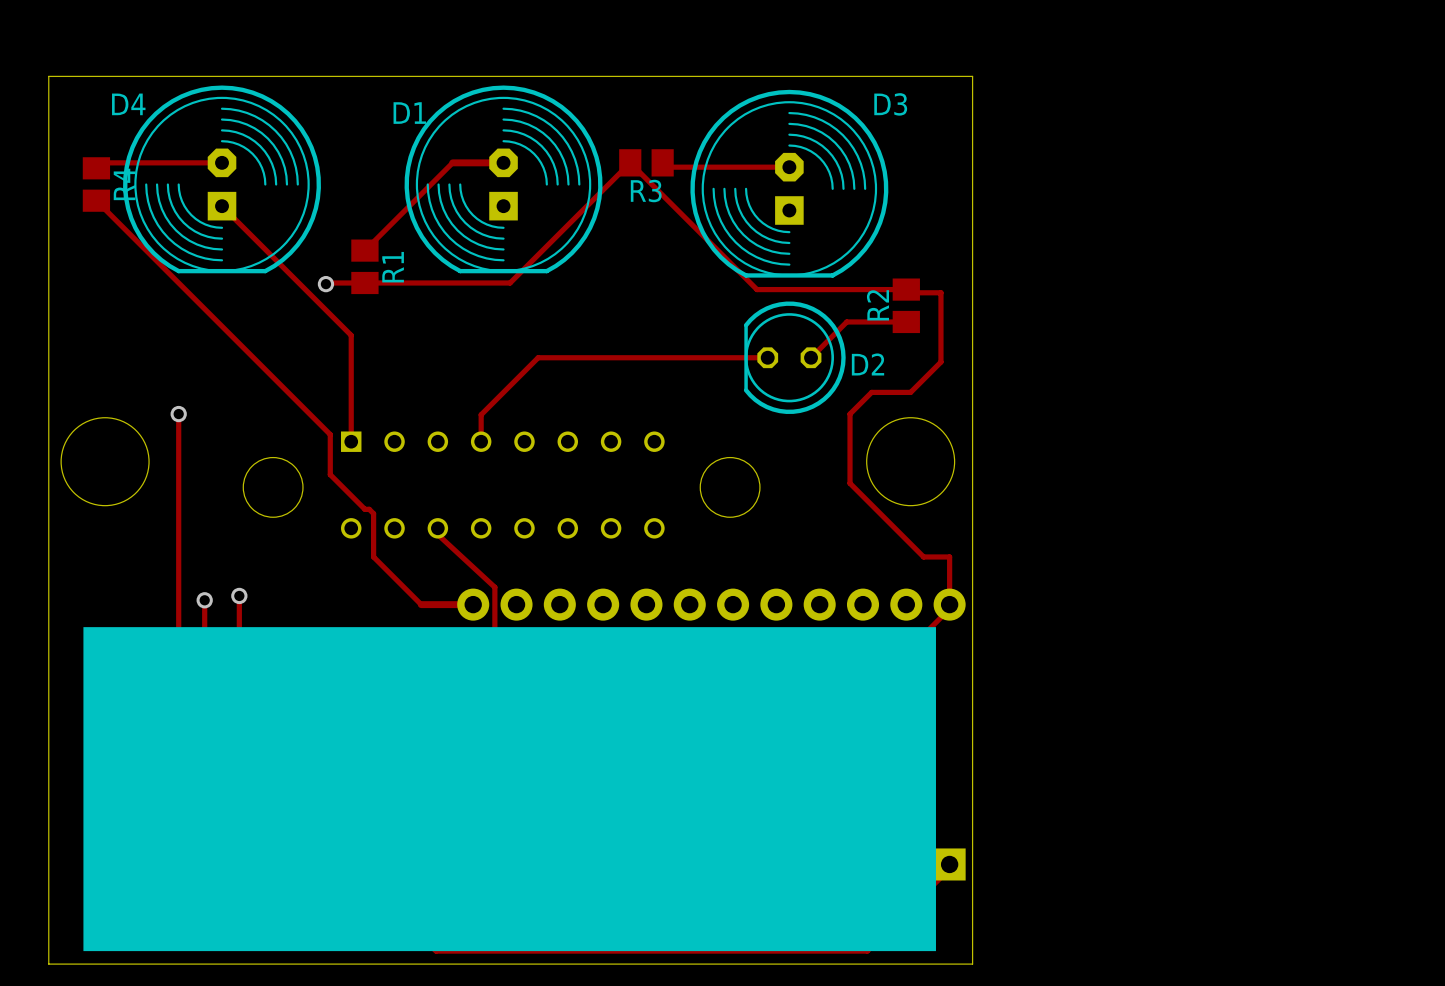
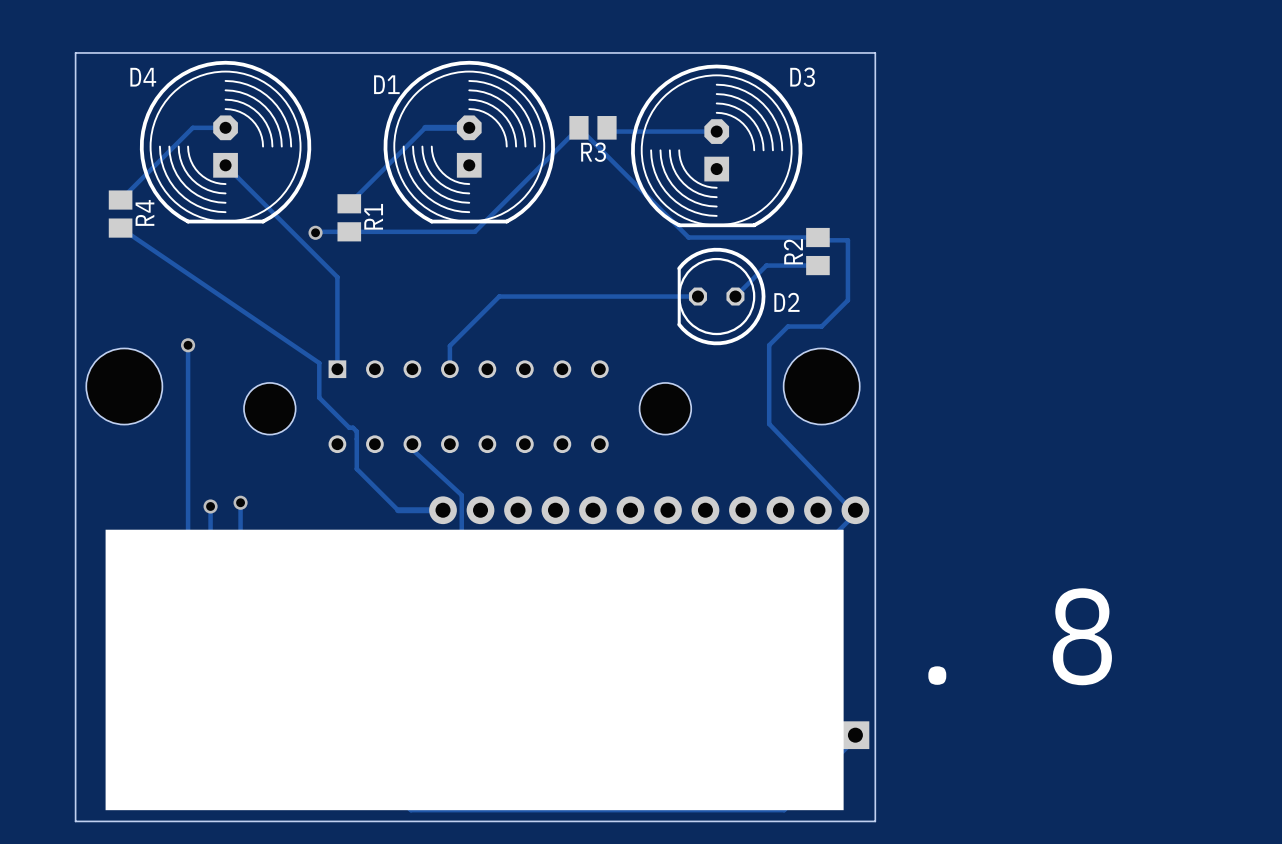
track: (184, 162) (101, 162) (96, 168) -> (192, 127) (120, 200)
R4 position: (96, 184) -> (120, 214)
track: (96, 200) (330, 434) -> (120, 228) (319, 363)
track: (850, 483) (923, 556) (949, 556) (949, 604) (945, 613) -> (769, 405) (769, 424) (855, 513) (851, 517)

